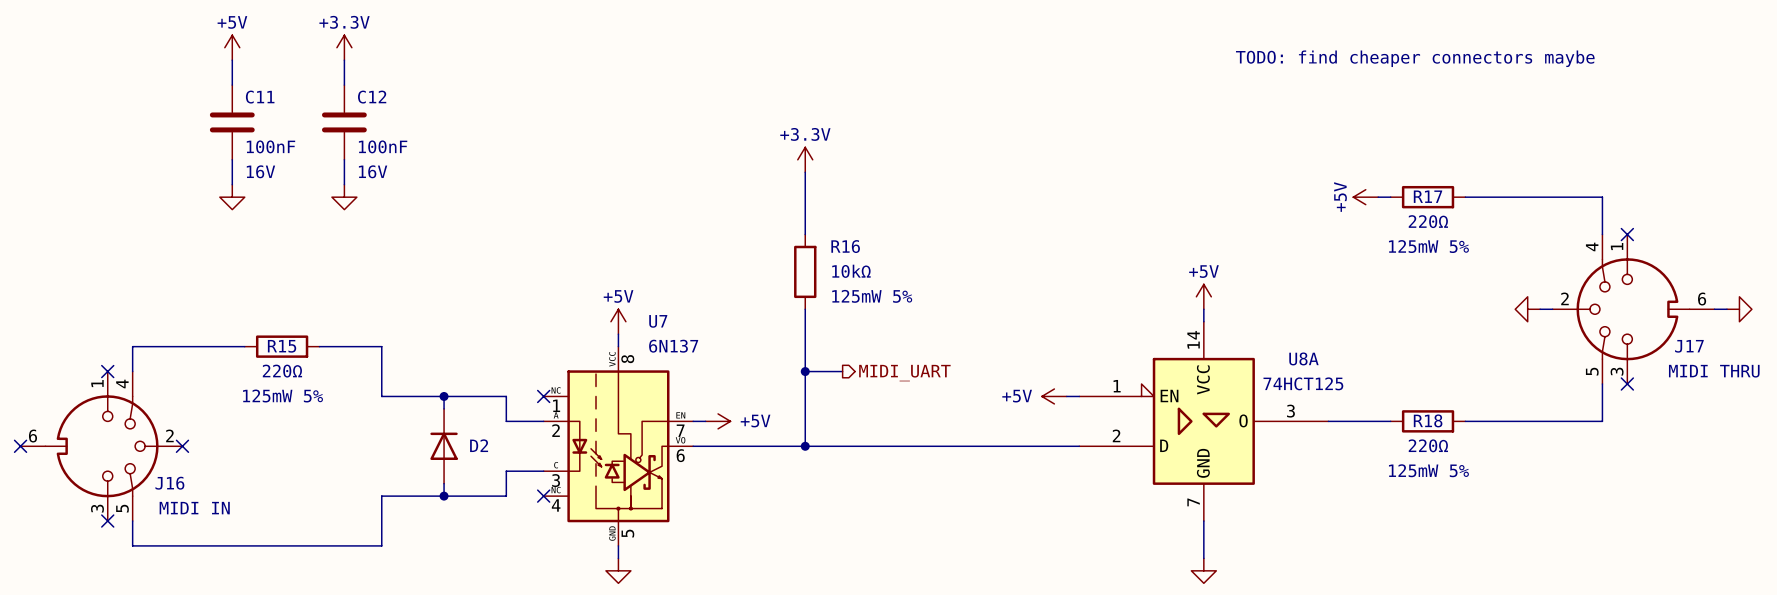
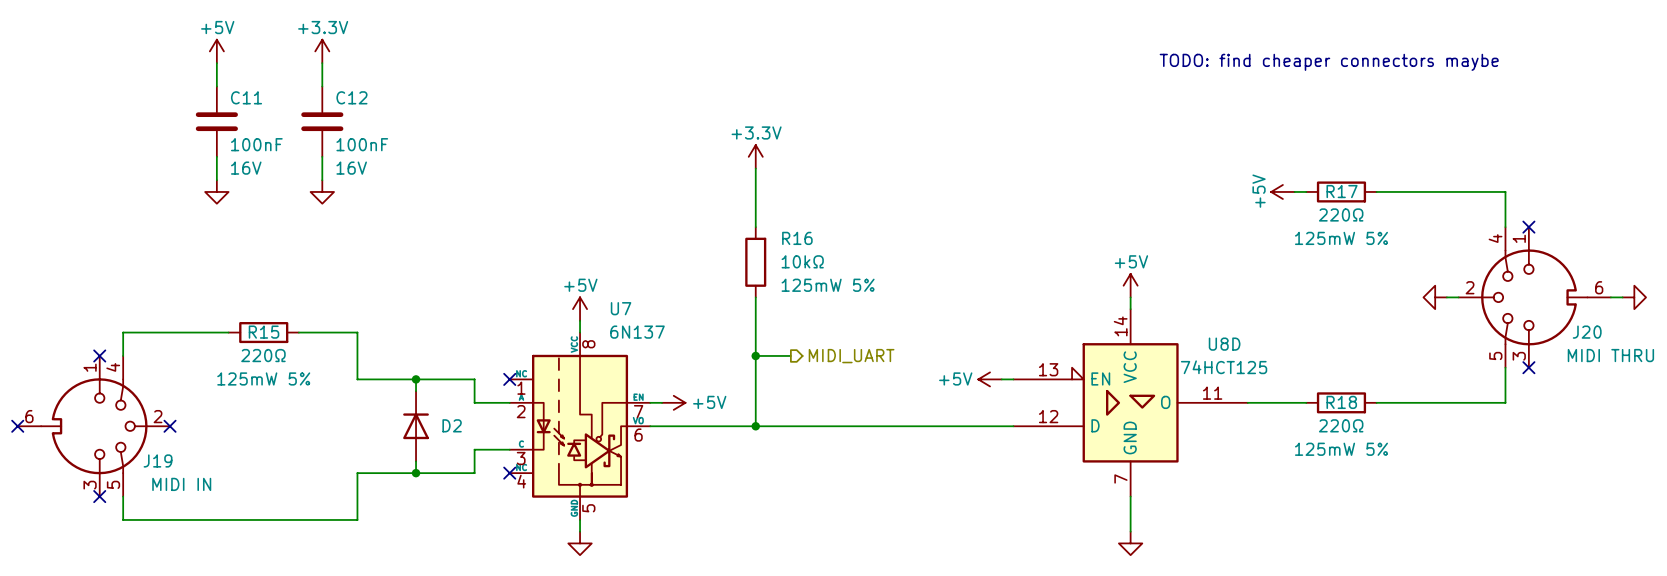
J17 name: J17 (1689, 346) -> J20 (1587, 332)
U8A name: U8A (1303, 358) -> U8D (1224, 344)
U8A pin number: 1 (1117, 386) -> 13 (1048, 369)
U8A pin number: 3 (1290, 411) -> 11 (1212, 393)
U8A pin number: 2 (1116, 435) -> 12 (1048, 416)
J16 name: J16 (169, 483) -> J19 (158, 460)

